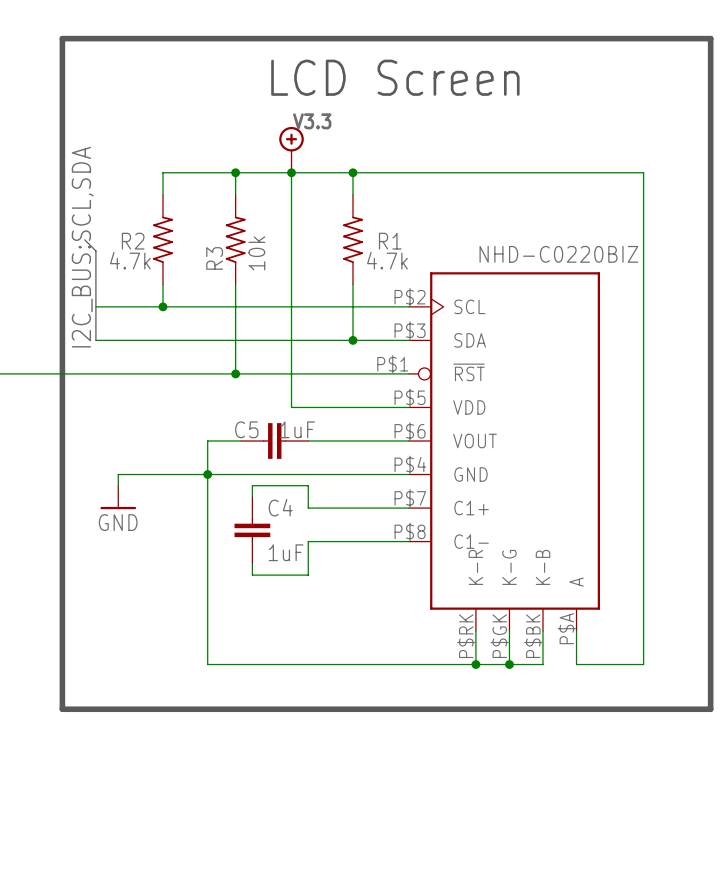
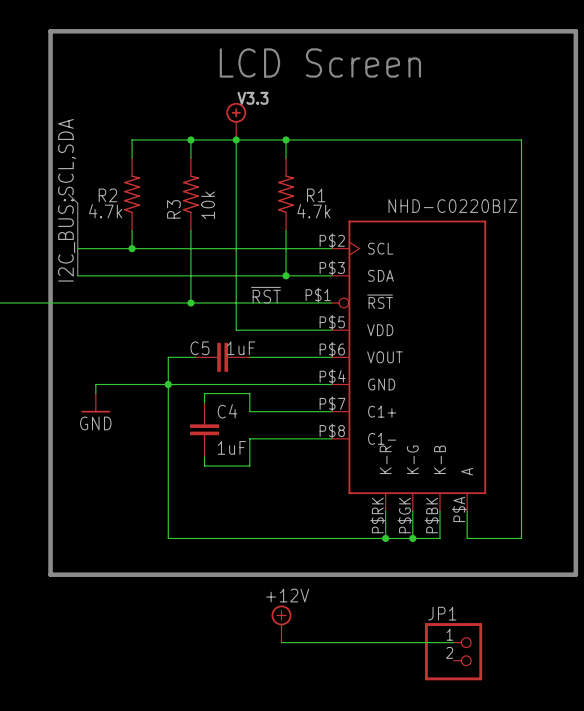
label: none -> ~{RST} (265, 295)
power symbol: none -> +12V (281, 624)
wire: none -> (281, 642) (453, 642)
JP1: none -> (453, 651)

